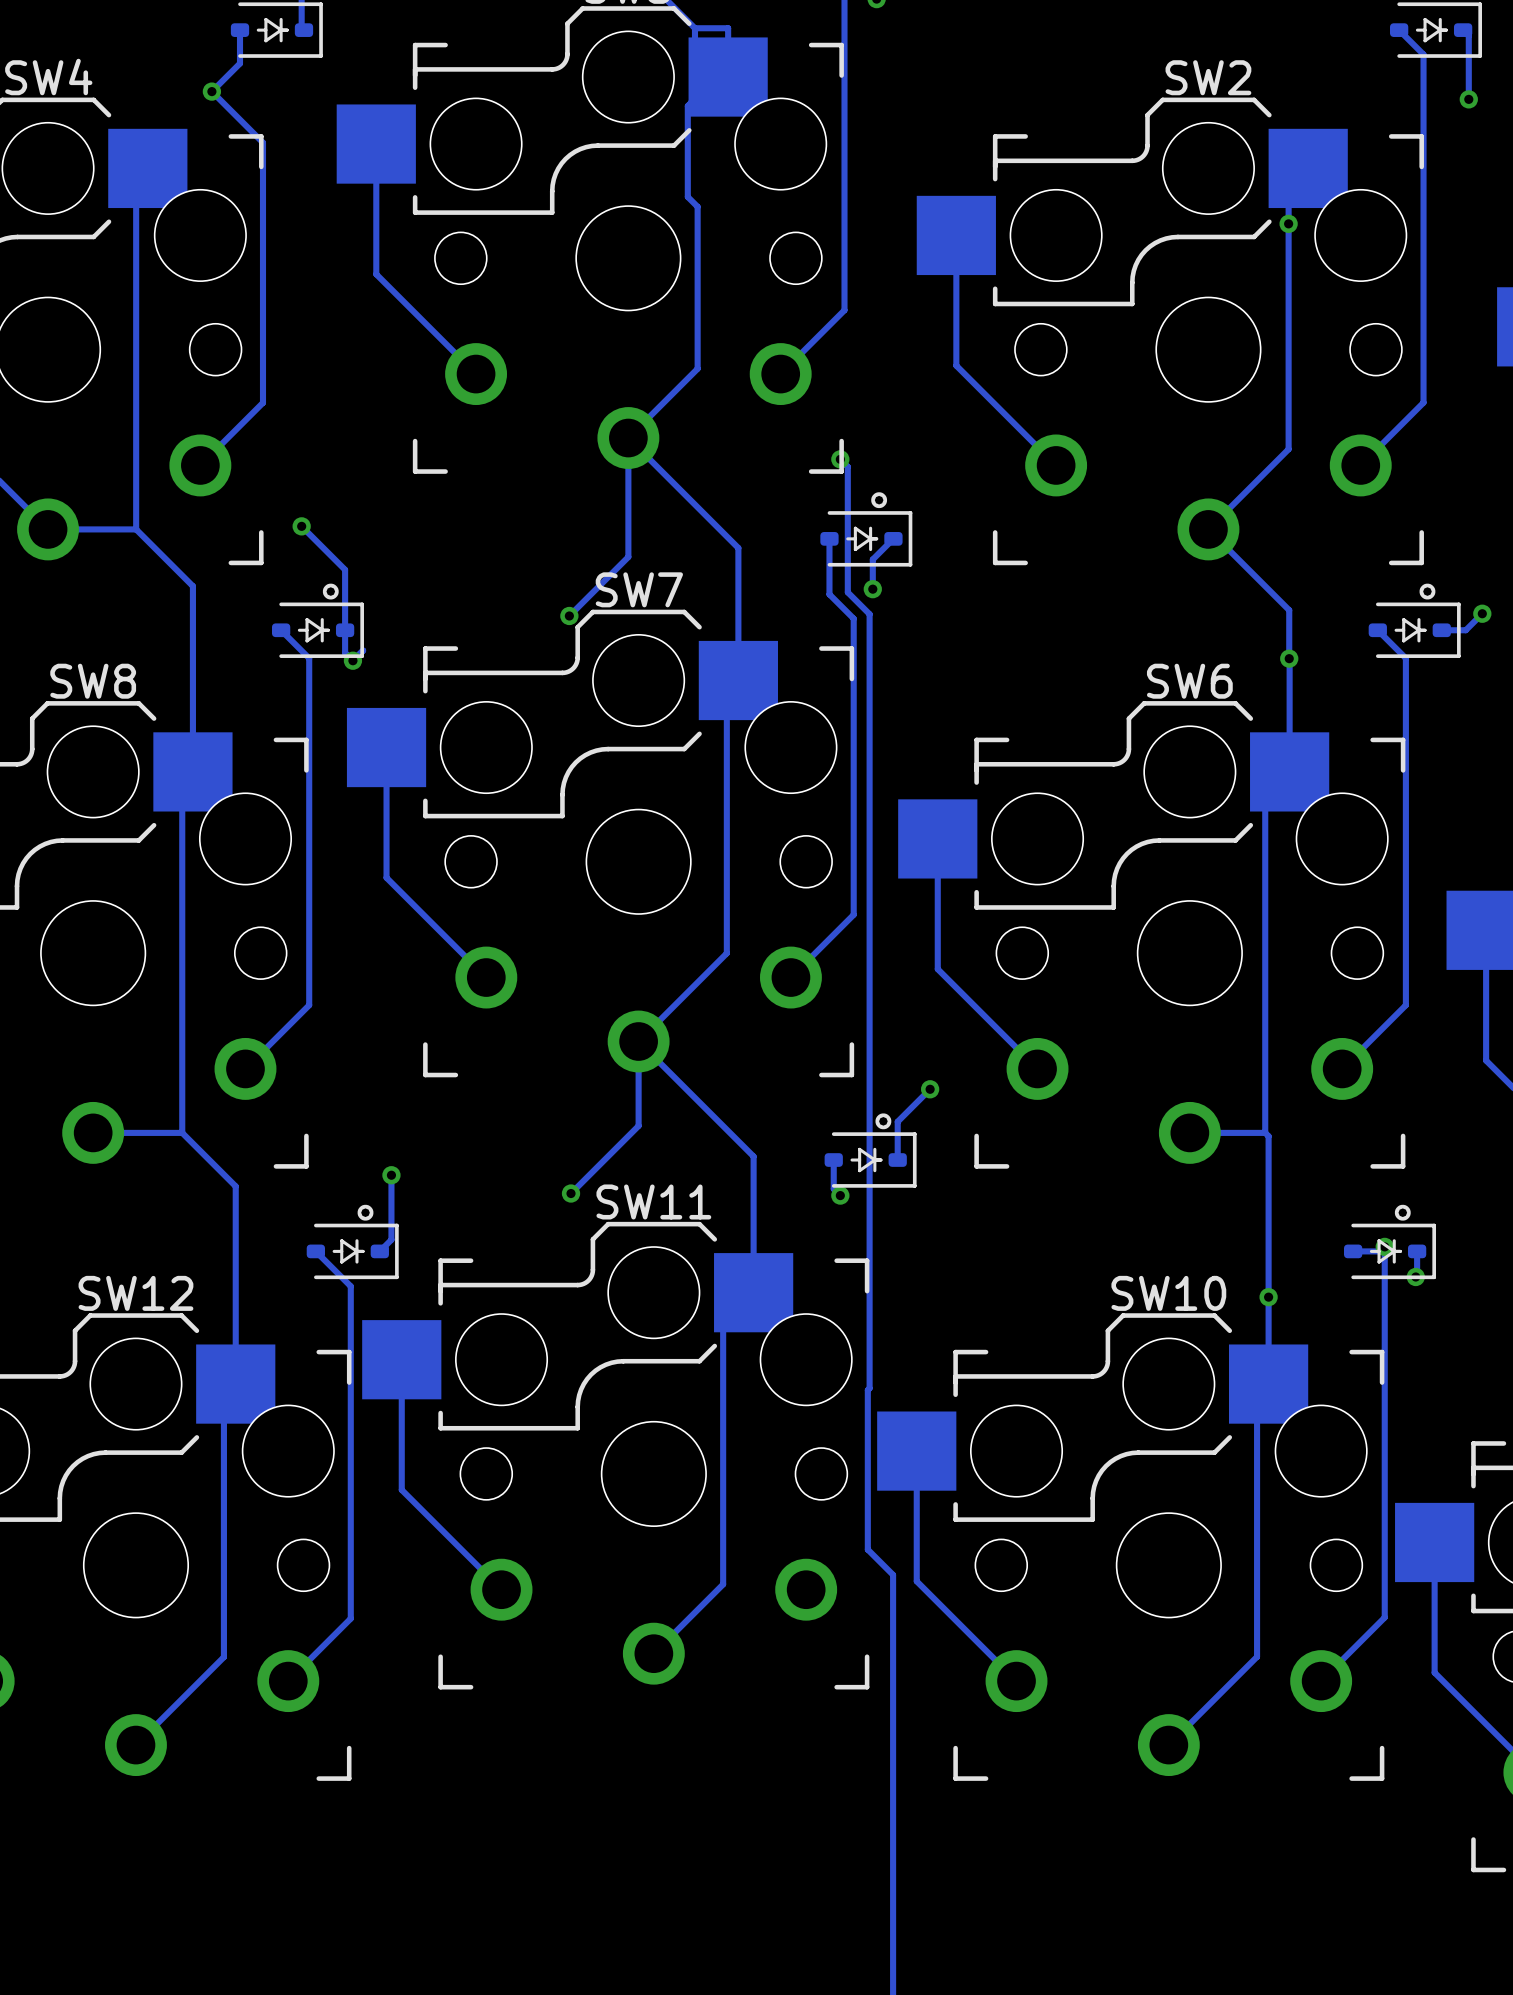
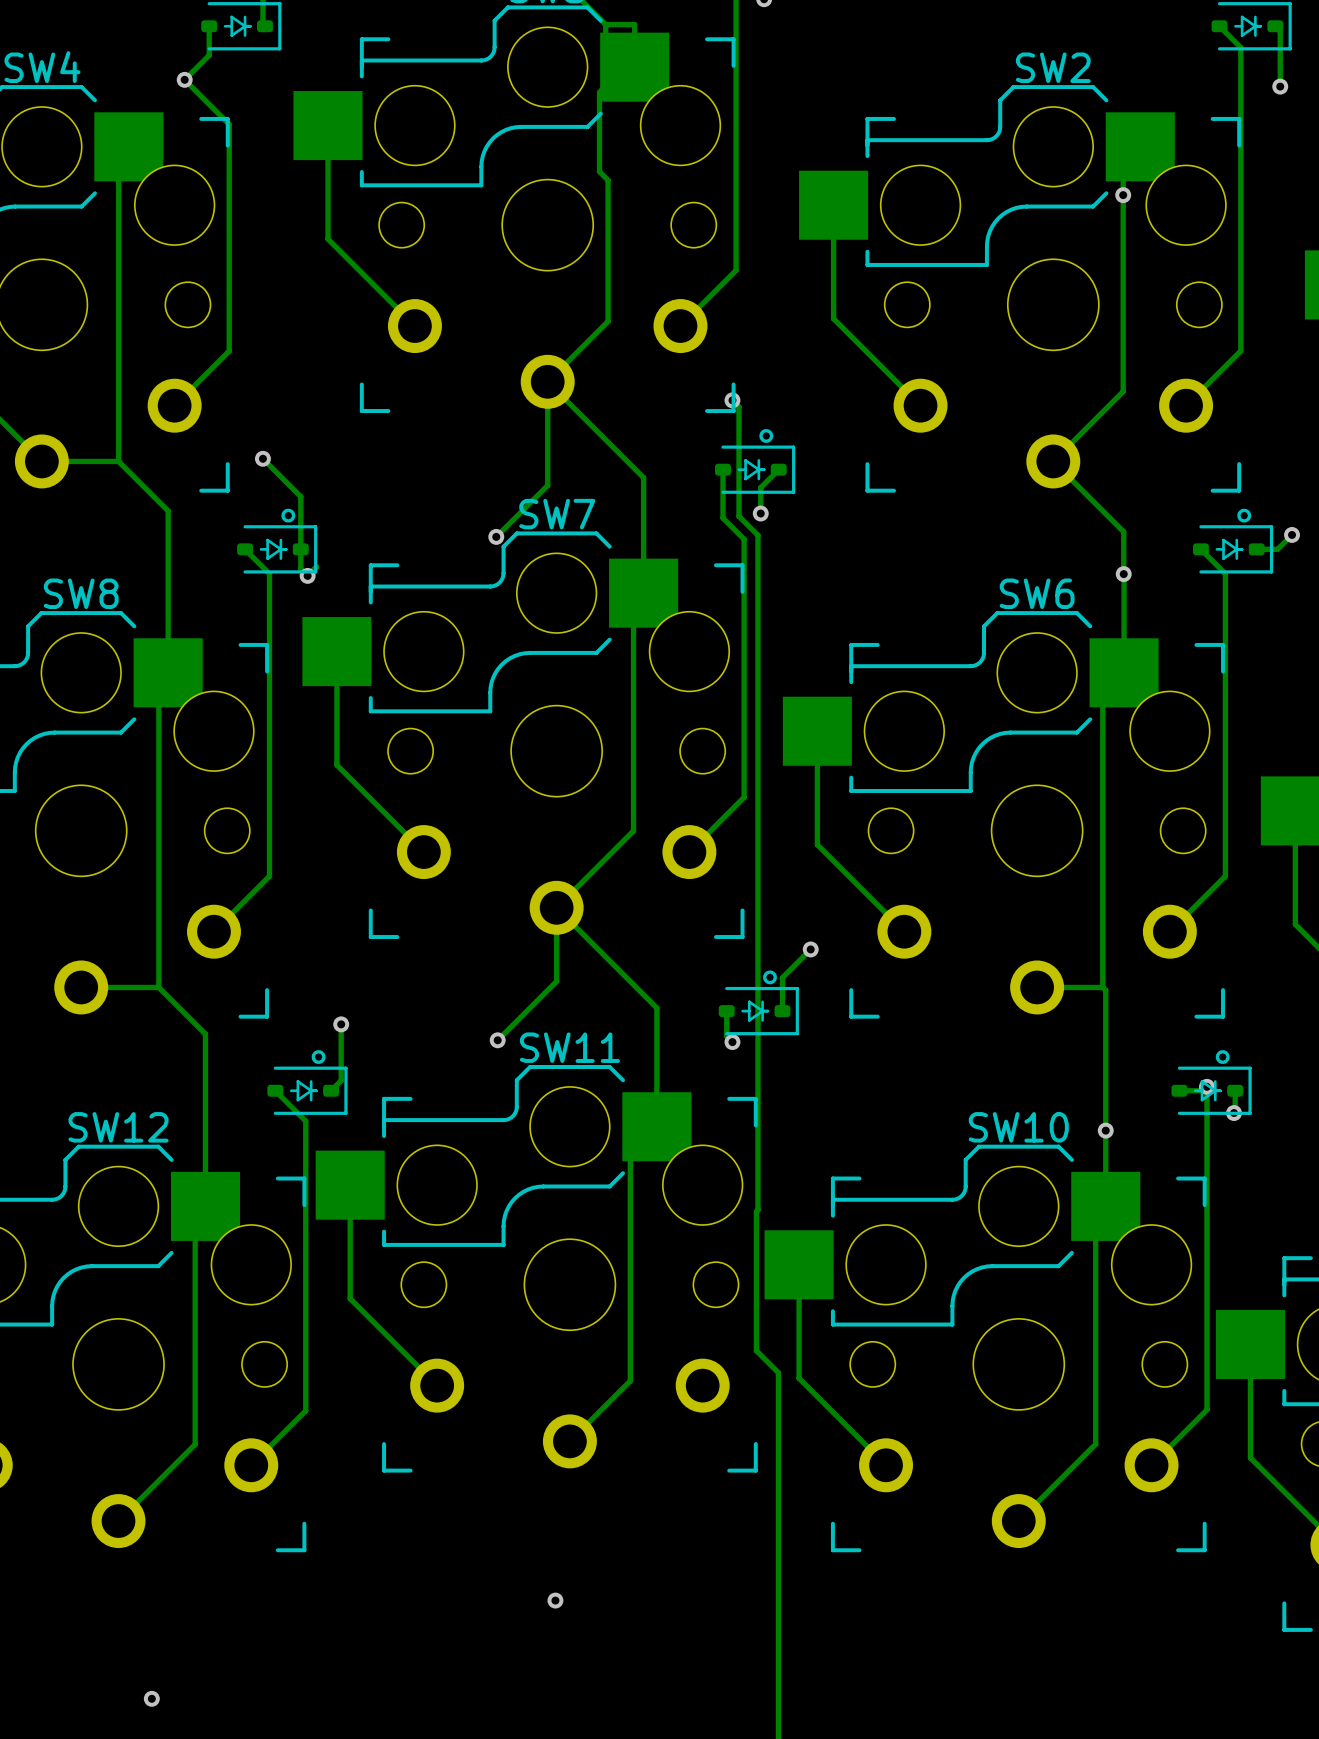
via: none -> (555, 1600)
via: none -> (151, 1698)

